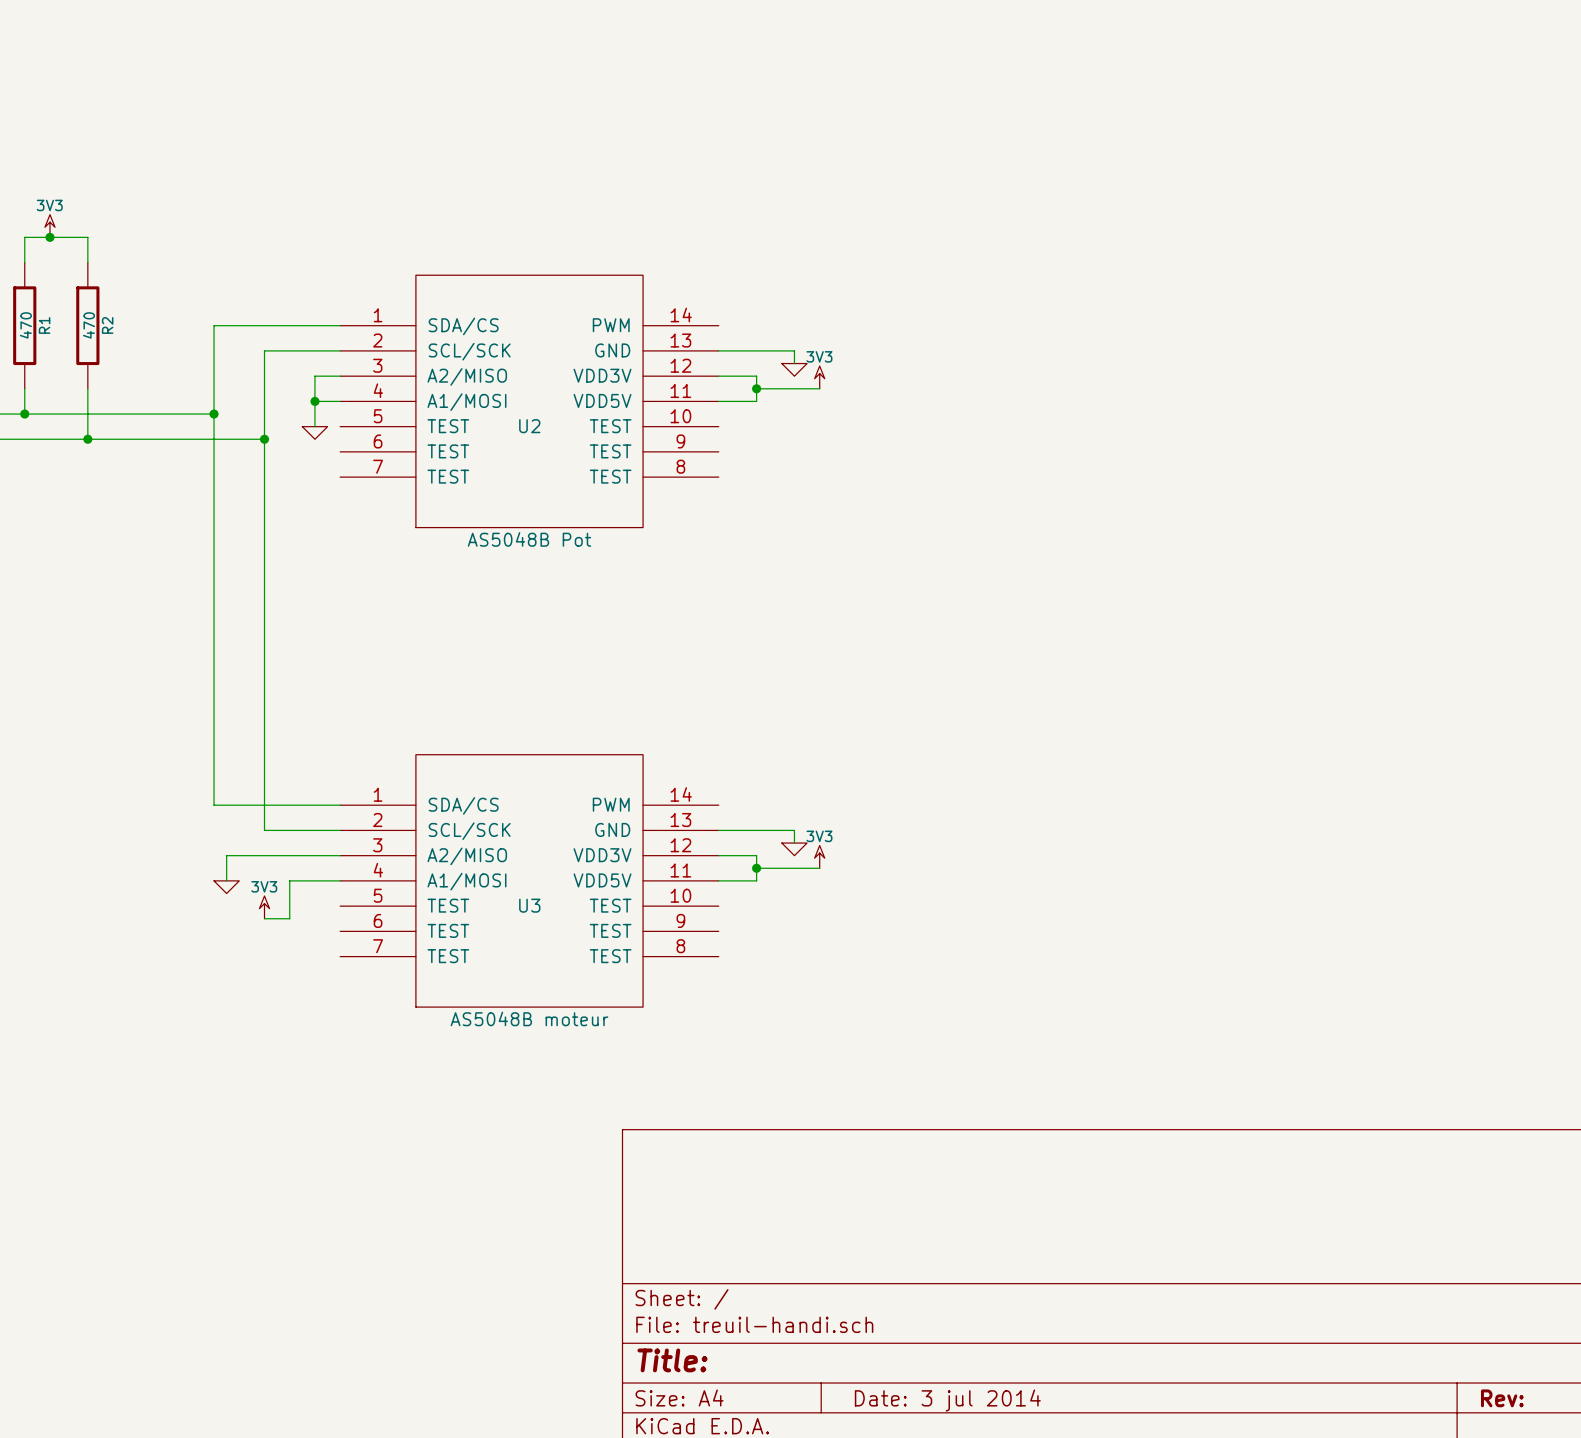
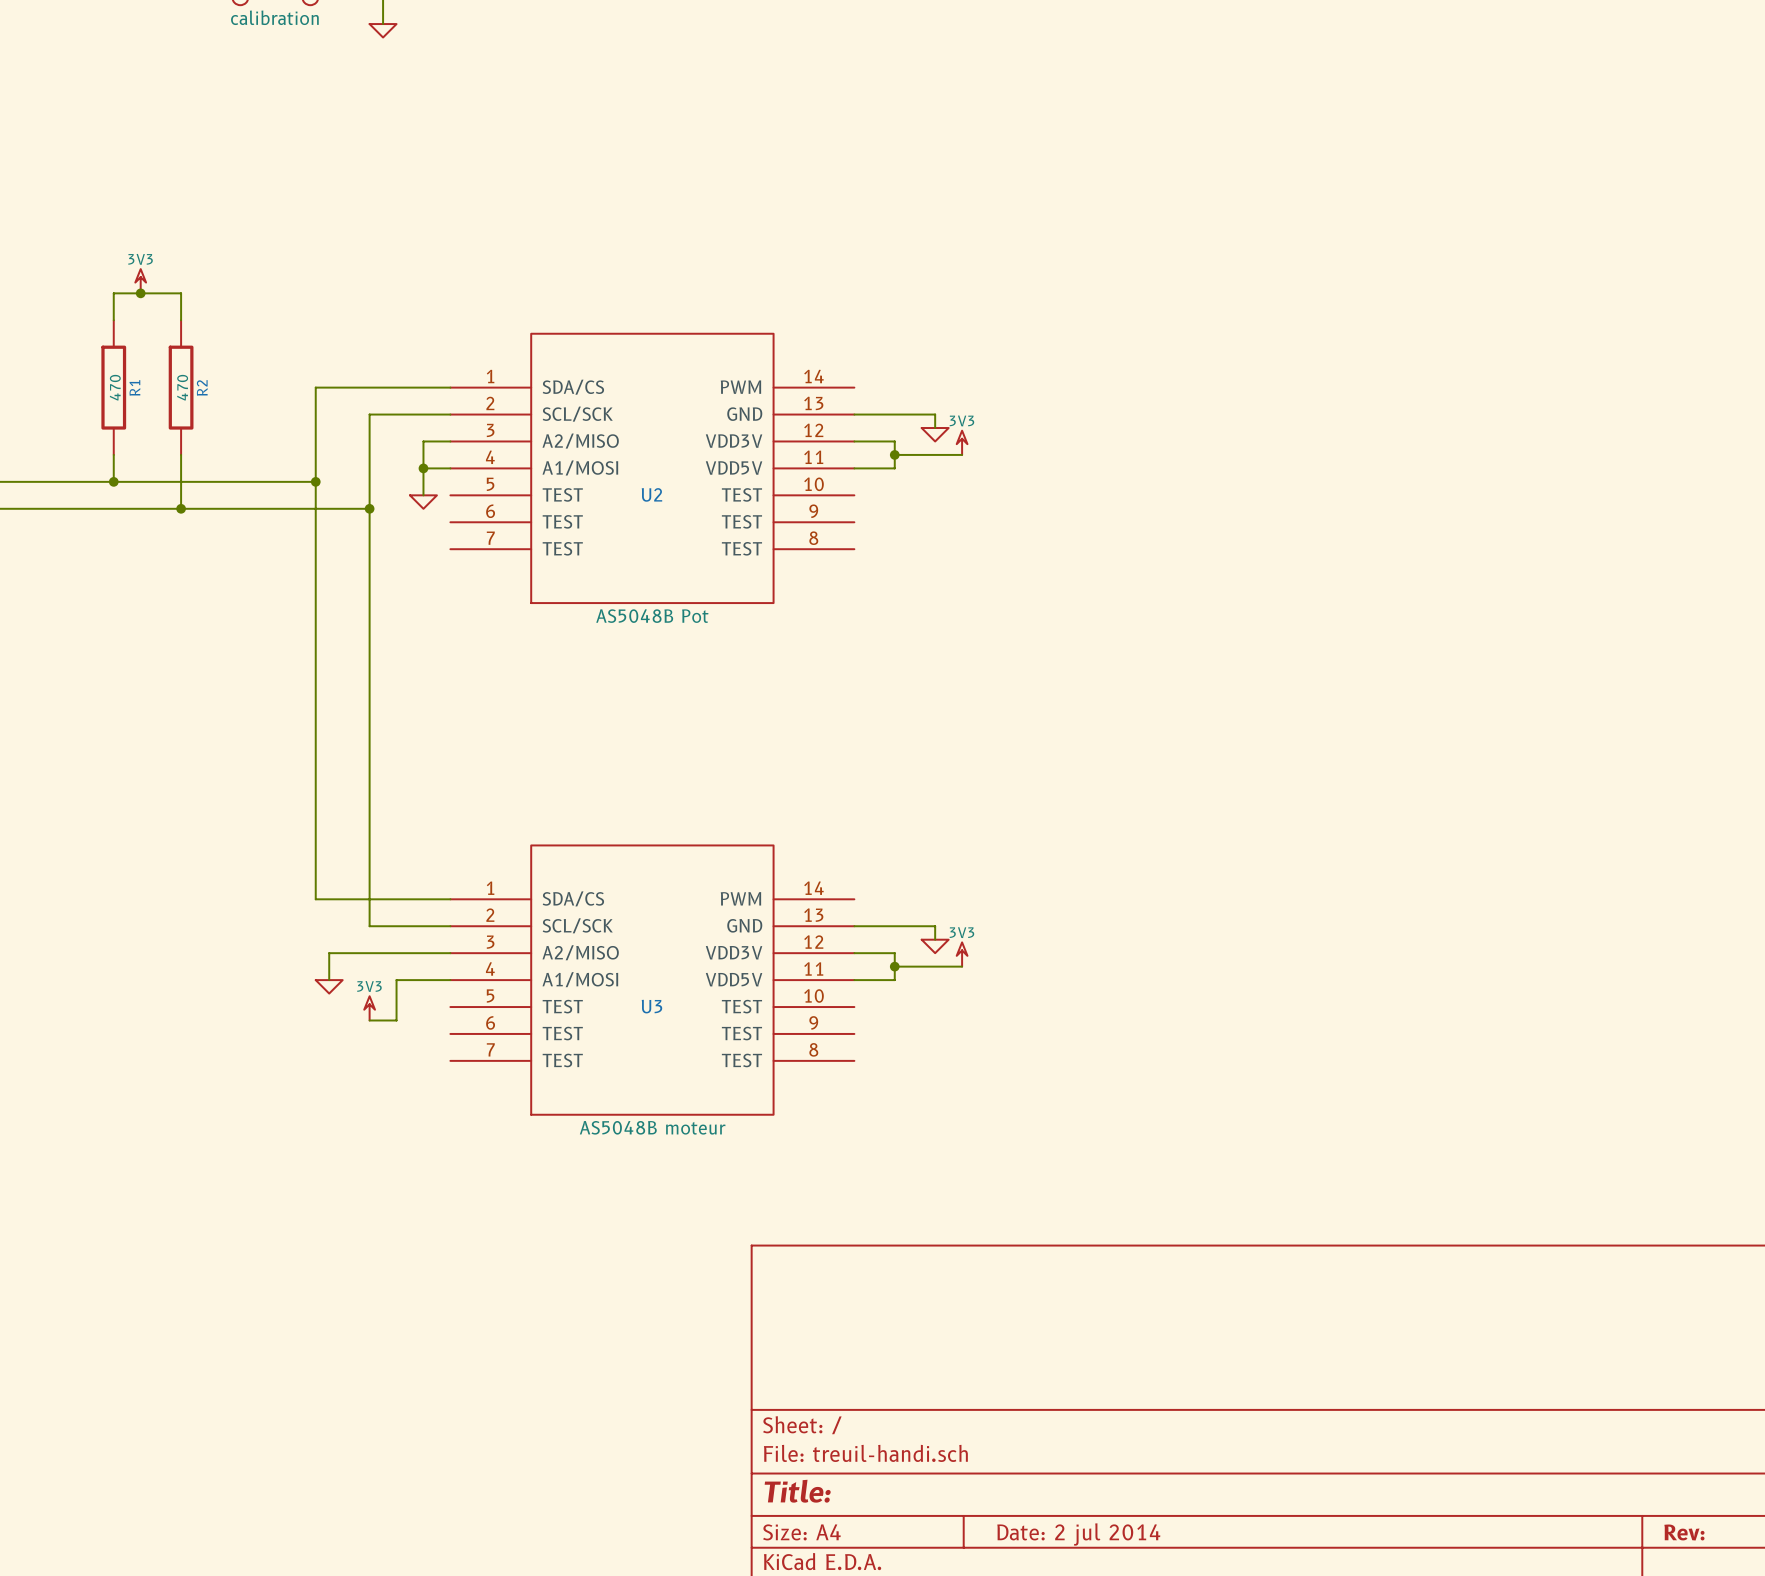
title block: Date: 3 jul 2014 (947, 1400) -> Date: 2 jul 2014 (1078, 1534)

